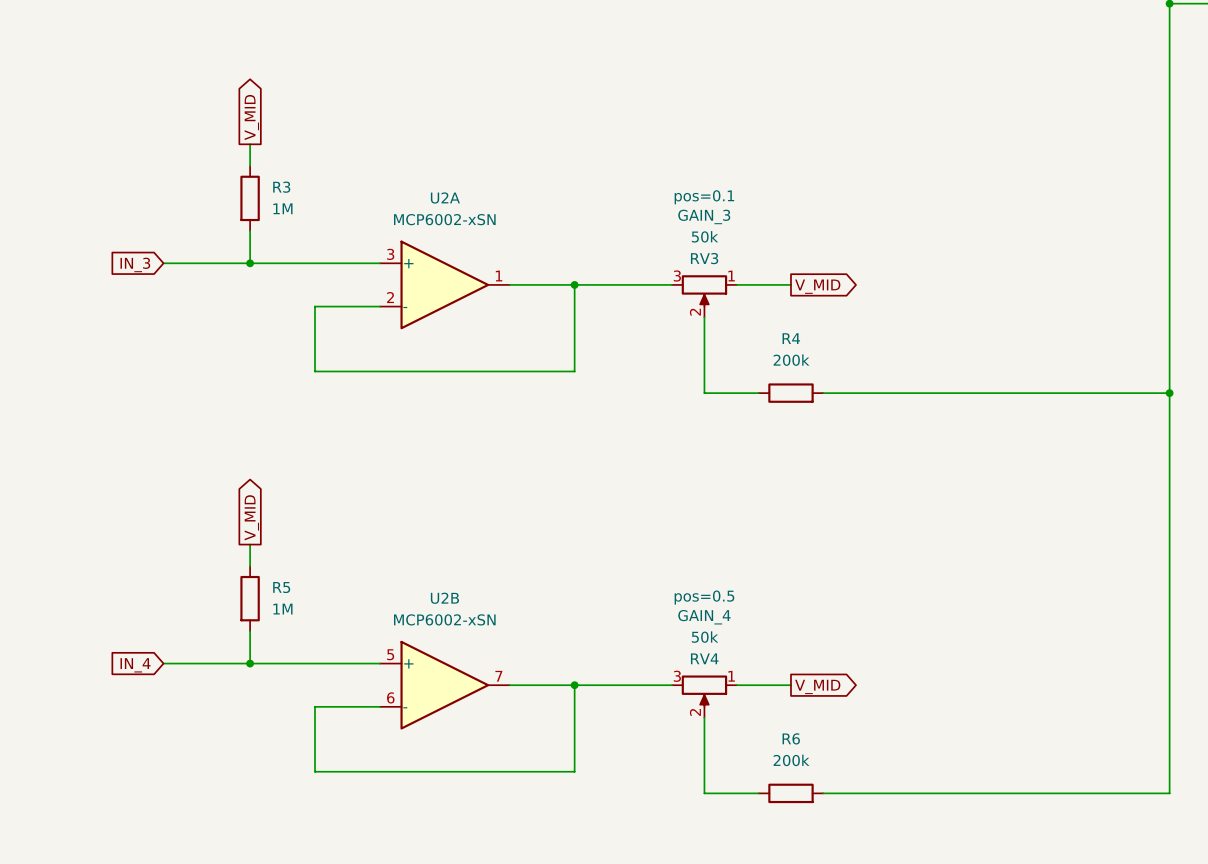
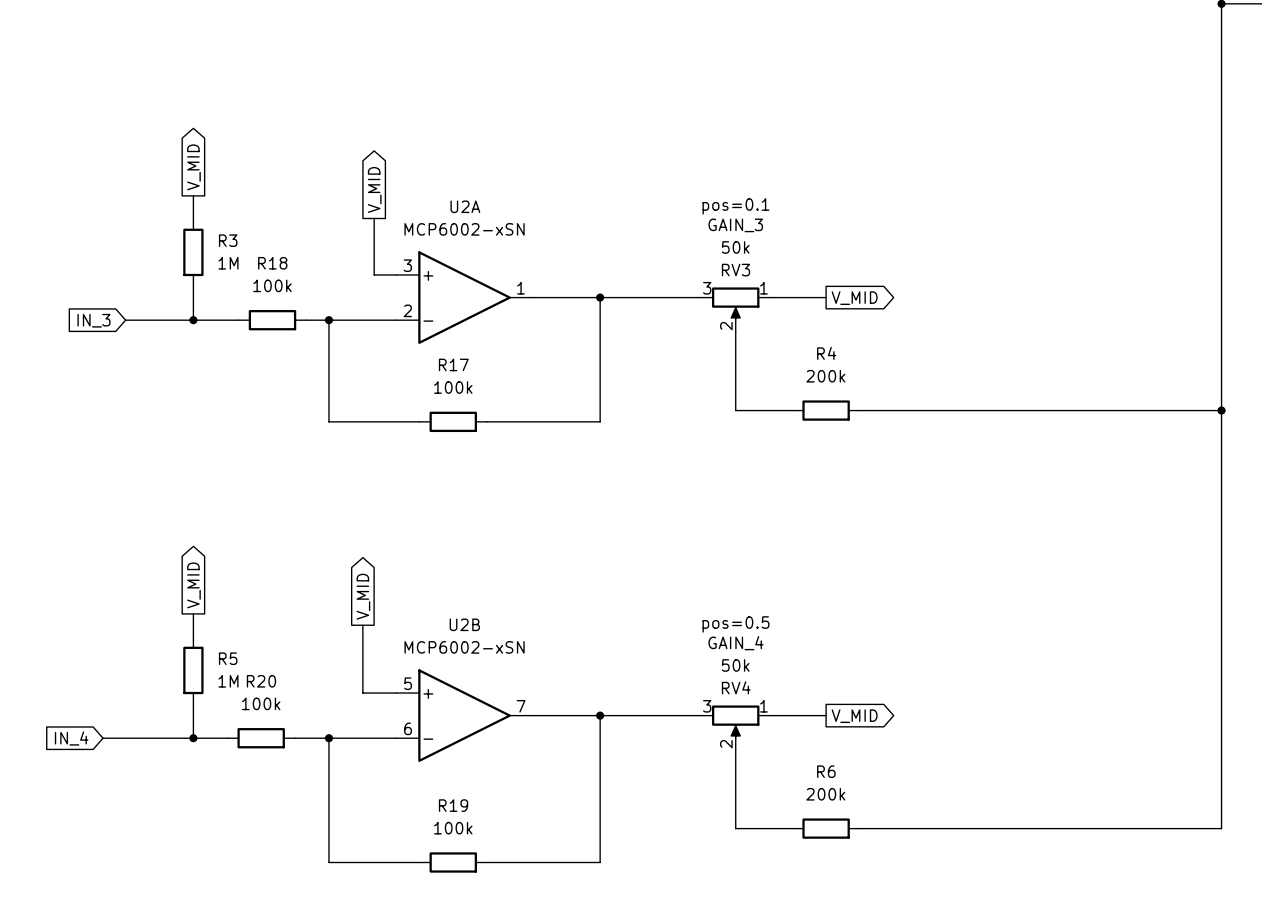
global label: V_MID (251, 117) -> none
wire: (250, 144) (250, 165) -> (193, 195) (193, 218)
global label: none -> V_MID (193, 167)
global label: none -> V_MID (374, 189)
R3 position: (250, 198) -> (193, 252)
wire: (250, 230) (250, 263) -> (193, 286) (193, 320)
wire: (163, 263) (358, 263) -> (374, 218) (374, 274)
junction: (250, 263) -> none
global label position: IN_3 (135, 264) -> IN_3 (93, 320)
wire: none -> (125, 320) (238, 320)
junction: none -> (193, 320)
R18: none -> 100k (272, 320)
wire: none -> (306, 320) (328, 320)
junction: none -> (328, 320)
wire: (315, 371) (574, 371) -> (487, 421) (600, 421) (600, 387)
wire: none -> (328, 387) (328, 421) (419, 421)
R17: none -> 100k (453, 421)
global label: V_MID (251, 517) -> none
wire: (250, 544) (250, 566) -> (193, 613) (193, 636)
global label: none -> V_MID (193, 585)
global label: none -> V_MID (363, 596)
R5 position: (250, 598) -> (193, 670)
wire: (250, 631) (250, 663) -> (193, 704) (193, 738)
wire: (163, 663) (347, 663) -> (362, 625) (362, 693)
junction: (250, 663) -> none
global label position: IN_4 (135, 665) -> IN_4 (71, 738)
wire: none -> (103, 738) (227, 738)
junction: none -> (193, 738)
R20: none -> 100k (261, 738)
wire: none -> (295, 738) (328, 738)
junction: none -> (328, 738)
wire: (315, 771) (574, 771) -> (487, 862) (600, 862) (600, 806)
wire: none -> (328, 806) (328, 862) (419, 862)
R19: none -> 100k (453, 862)

